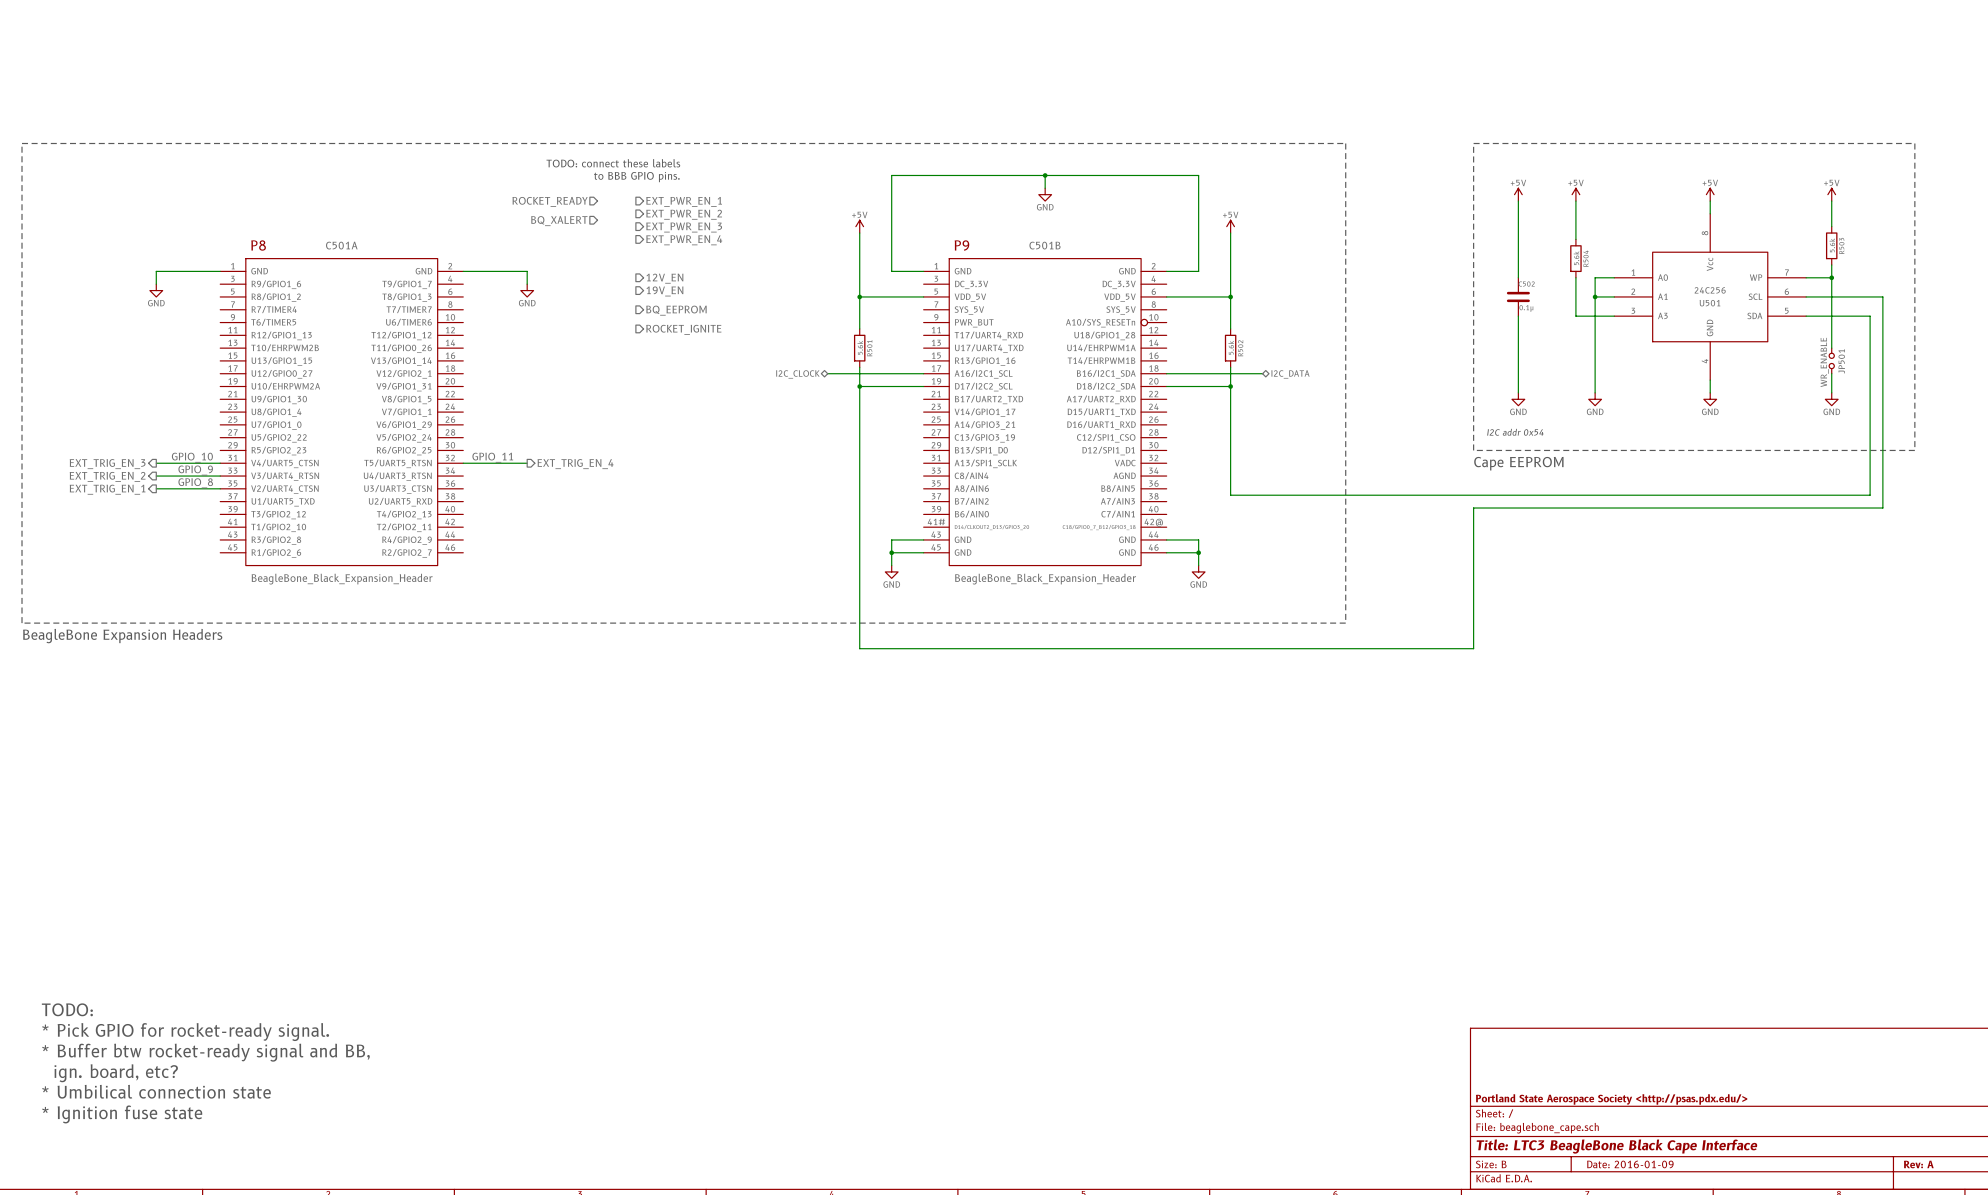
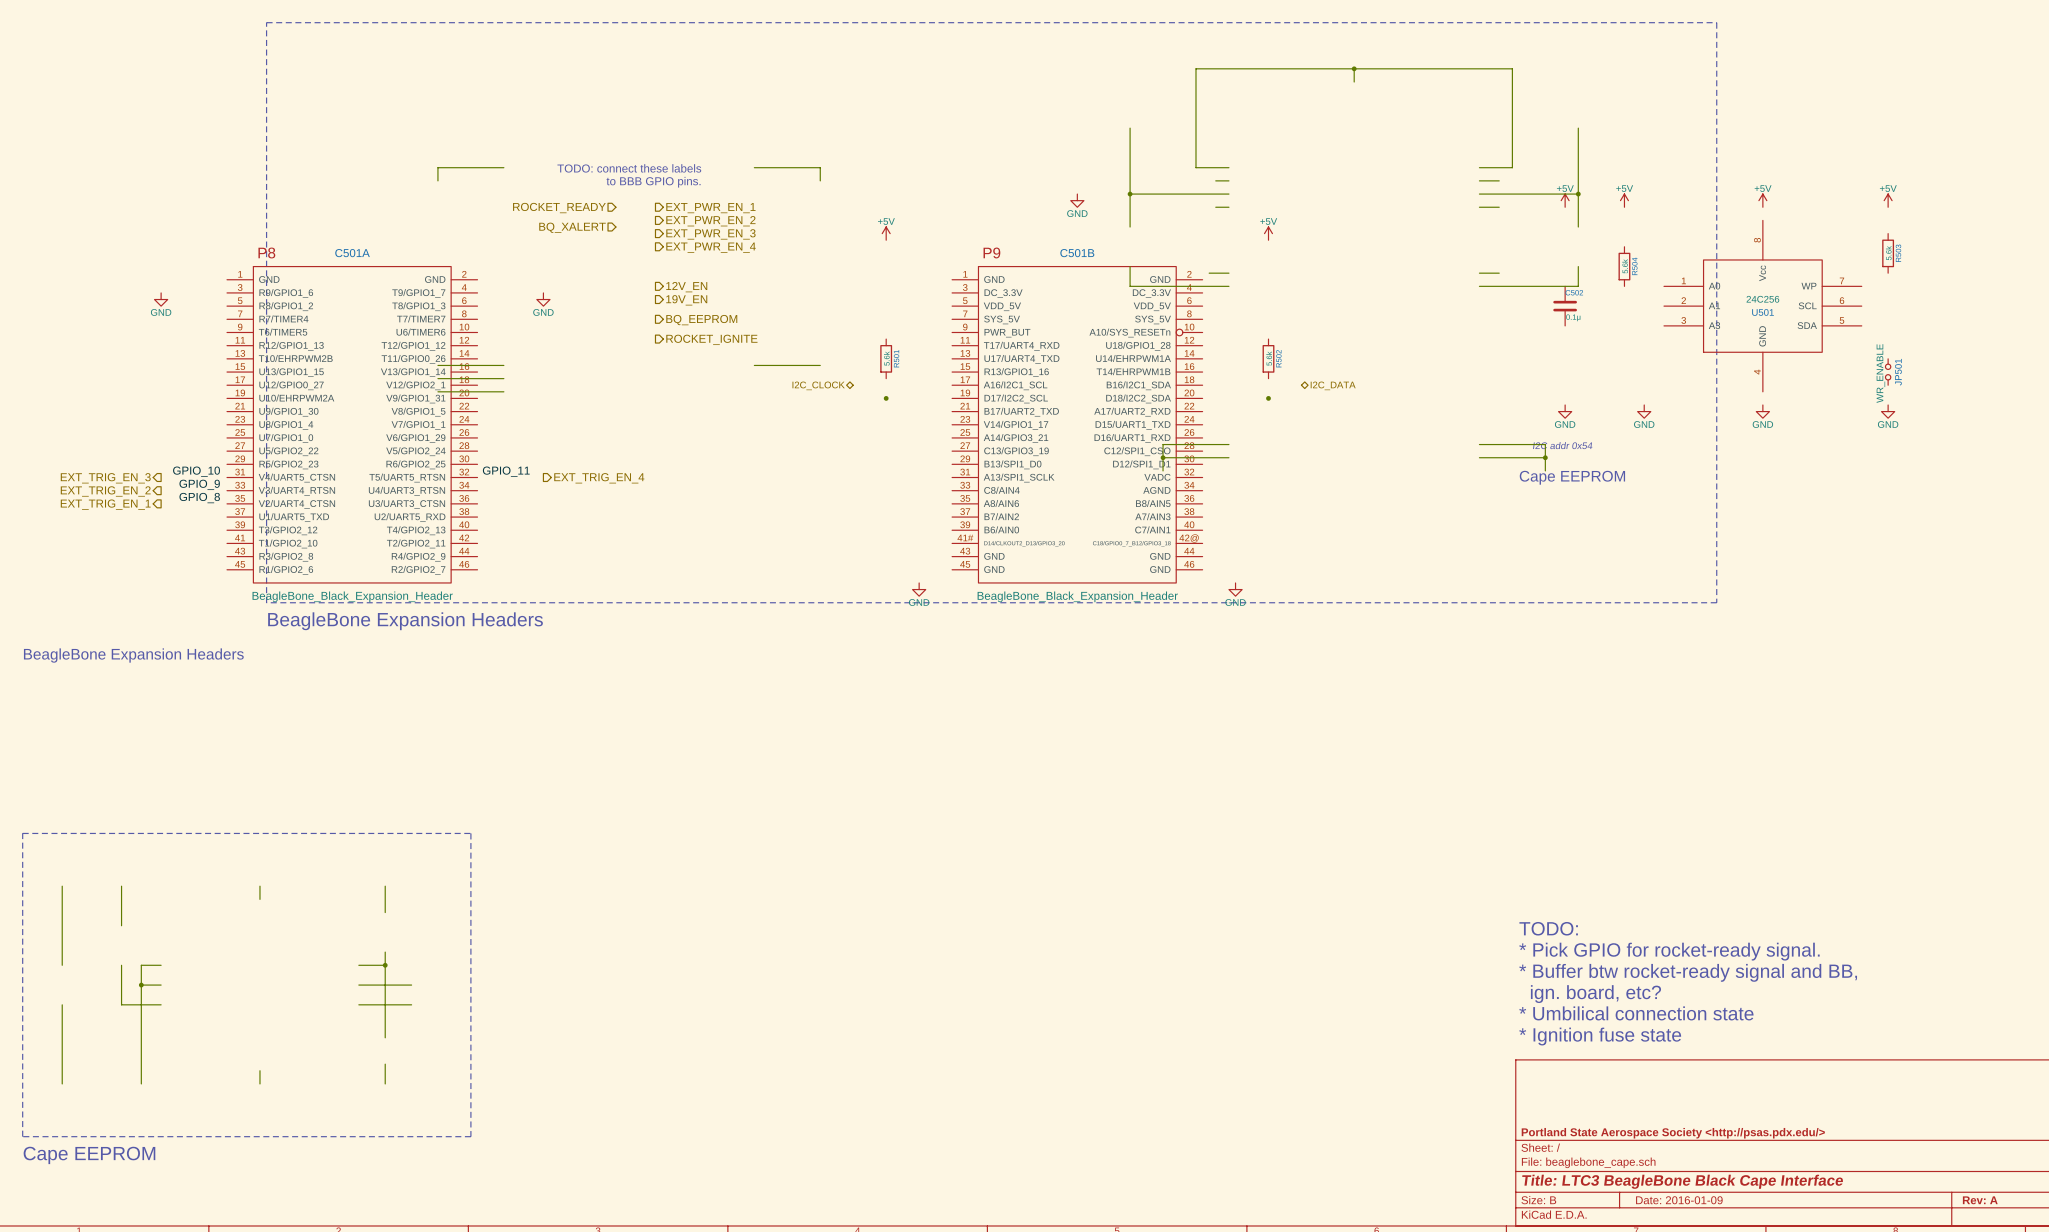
wire: none -> (1354, 68) (1354, 82)
junction: none -> (1354, 68)
wire: none -> (1130, 128) (1130, 227)
wire: none -> (1578, 128) (1578, 227)
line: (22, 143) (1345, 143) (1345, 623) (22, 623) (22, 143) -> (266, 22) (266, 602) (1716, 602) (1716, 22) (266, 22)
line: (1473, 143) (1473, 450) (1914, 450) (1914, 143) (1473, 143) -> none
wire: none -> (503, 167) (437, 167) (437, 180)
wire: none -> (754, 167) (820, 167) (820, 180)
wire: none -> (1228, 167) (1195, 167) (1195, 68) (1512, 68) (1512, 167) (1479, 167)
wire: (1045, 175) (1045, 188) -> none
junction: (1045, 175) -> none
wire: (1179, 175) (891, 175) (891, 271) (923, 271) -> none
wire: (1192, 175) (1198, 175) (1198, 271) (1166, 271) -> none
wire: none -> (1479, 180) (1499, 180)
wire: none -> (1130, 194) (1228, 194)
junction: none -> (1130, 194)
wire: none -> (1479, 194) (1578, 194)
junction: none -> (1578, 194)
wire: none -> (1215, 207) (1228, 207)
wire: none -> (1479, 207) (1499, 207)
wire: (1518, 201) (1518, 277) -> none
wire: (1575, 201) (1575, 239) -> none
wire: (1710, 201) (1710, 213) -> none
wire: (1831, 201) (1831, 226) -> none
wire: (859, 233) (859, 328) -> none
wire: (1230, 233) (1230, 328) -> none
wire: none -> (1130, 266) (1130, 286) (1228, 286)
wire: none -> (1578, 266) (1578, 286) (1479, 286)
wire: none -> (1209, 273) (1228, 273)
wire: none -> (1479, 273) (1499, 273)
wire: (1831, 265) (1831, 348) -> none
wire: (220, 271) (156, 271) (156, 284) -> none
wire: (463, 271) (527, 271) (527, 284) -> none
wire: (1575, 277) (1575, 316) (1614, 316) -> none
wire: (1614, 277) (1595, 277) (1595, 392) -> none
wire: (1806, 277) (1831, 277) -> none
junction: (1831, 277) -> none
wire: (859, 296) (923, 296) -> none
junction: (859, 296) -> none
wire: (1166, 296) (1230, 296) -> none
junction: (1230, 296) -> none
wire: (1595, 296) (1614, 296) -> none
junction: (1595, 296) -> none
wire: (1806, 296) (1882, 296) (1882, 508) (1473, 508) (1473, 648) (859, 648) (859, 367) -> none
wire: (1518, 316) (1518, 392) -> none
wire: (1806, 316) (1870, 316) (1870, 495) (1230, 495) (1230, 367) -> none
wire: none -> (437, 365) (503, 365)
wire: none -> (754, 365) (820, 365)
wire: none -> (437, 378) (503, 378)
wire: (827, 373) (923, 373) -> none
wire: (1166, 373) (1262, 373) -> none
wire: (1831, 373) (1831, 392) -> none
wire: (1710, 380) (1710, 392) -> none
wire: (859, 386) (923, 386) -> none
wire: (1166, 386) (1230, 386) -> (1163, 457) (1228, 457)
wire: none -> (1228, 444) (1163, 444) (1163, 470)
wire: none -> (1479, 444) (1545, 444) (1545, 470)
junction: none -> (1163, 457)
wire: none -> (1479, 457) (1545, 457)
junction: none -> (1545, 457)
wire: (156, 463) (220, 463) -> none
wire: (463, 463) (527, 463) -> (437, 391) (503, 391)
wire: (156, 476) (220, 476) -> none
wire: (156, 488) (220, 488) -> none
wire: (923, 539) (891, 539) (891, 565) -> none
wire: (1166, 539) (1198, 539) (1198, 565) -> none
wire: (891, 552) (923, 552) -> none
junction: (891, 552) -> none
wire: (1166, 552) (1198, 552) -> none
junction: (1198, 552) -> none
text: none -> BeagleBone Expansion Headers (405, 621)
line: none -> (22, 833) (22, 1136) (470, 1136) (470, 833) (22, 833)
wire: none -> (62, 886) (62, 965)
wire: none -> (121, 886) (121, 925)
wire: none -> (259, 886) (259, 899)
wire: none -> (385, 886) (385, 912)
text: none -> TODO: (1548, 928)
wire: none -> (385, 952) (385, 1037)
text: none -> * Pick GPIO for rocket-ready signal. (1669, 951)
wire: none -> (121, 965) (121, 1004) (161, 1004)
wire: none -> (161, 965) (141, 965) (141, 1083)
wire: none -> (358, 965) (385, 965)
junction: none -> (385, 965)
text: none -> * Buffer btw rocket-ready signal and BB, (1688, 972)
wire: none -> (141, 985) (161, 985)
junction: none -> (141, 985)
wire: none -> (358, 985) (411, 985)
text: none -> ign. board, etc? (1595, 994)
wire: none -> (62, 1004) (62, 1083)
wire: none -> (358, 1004) (411, 1004)
text: none -> * Umbilical connection state (1636, 1013)
text: none -> * Ignition fuse state (1600, 1036)
text: TODO: (67, 1009) -> none
text: * Pick GPIO for rocket-ready signal. (185, 1032) -> none
wire: none -> (385, 1064) (385, 1083)
wire: none -> (259, 1070) (259, 1083)
text: * Buffer btw rocket-ready signal and BB, (206, 1052) -> none
text: ign. board, etc? (116, 1073) -> none
text: * Umbilical connection state (156, 1091) -> none
text: * Ignition fuse state (122, 1114) -> none
text: none -> Cape EEPROM (89, 1155)

